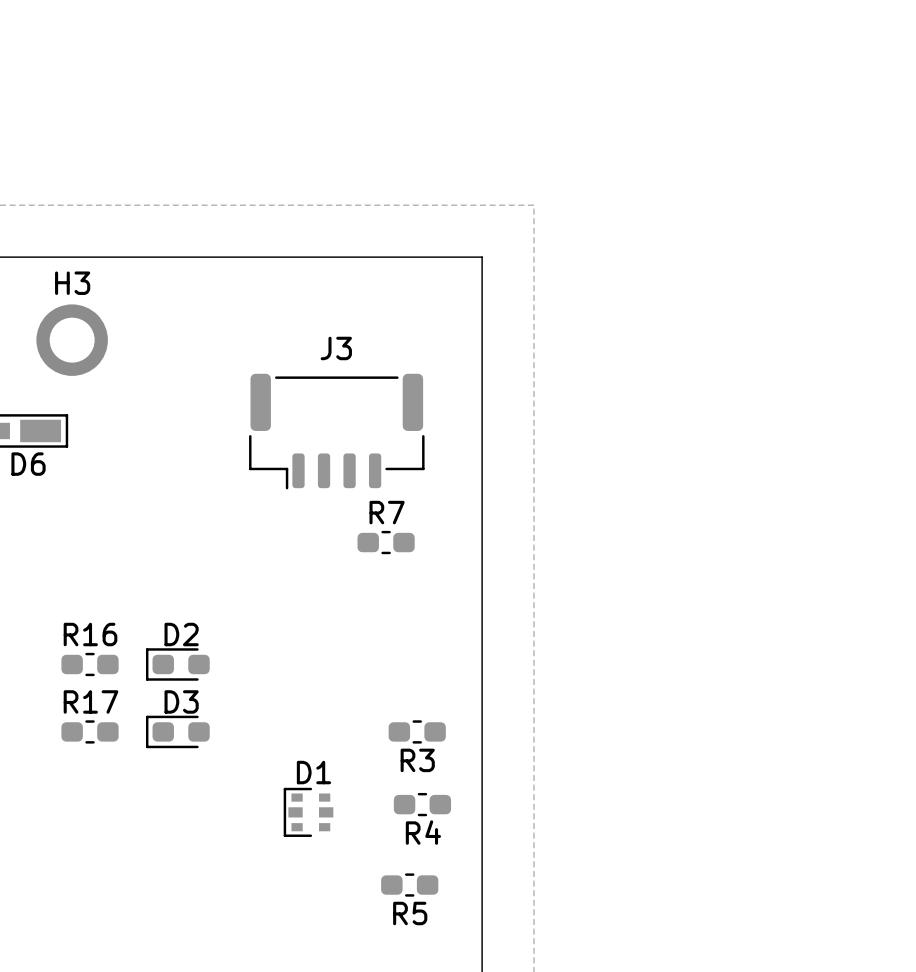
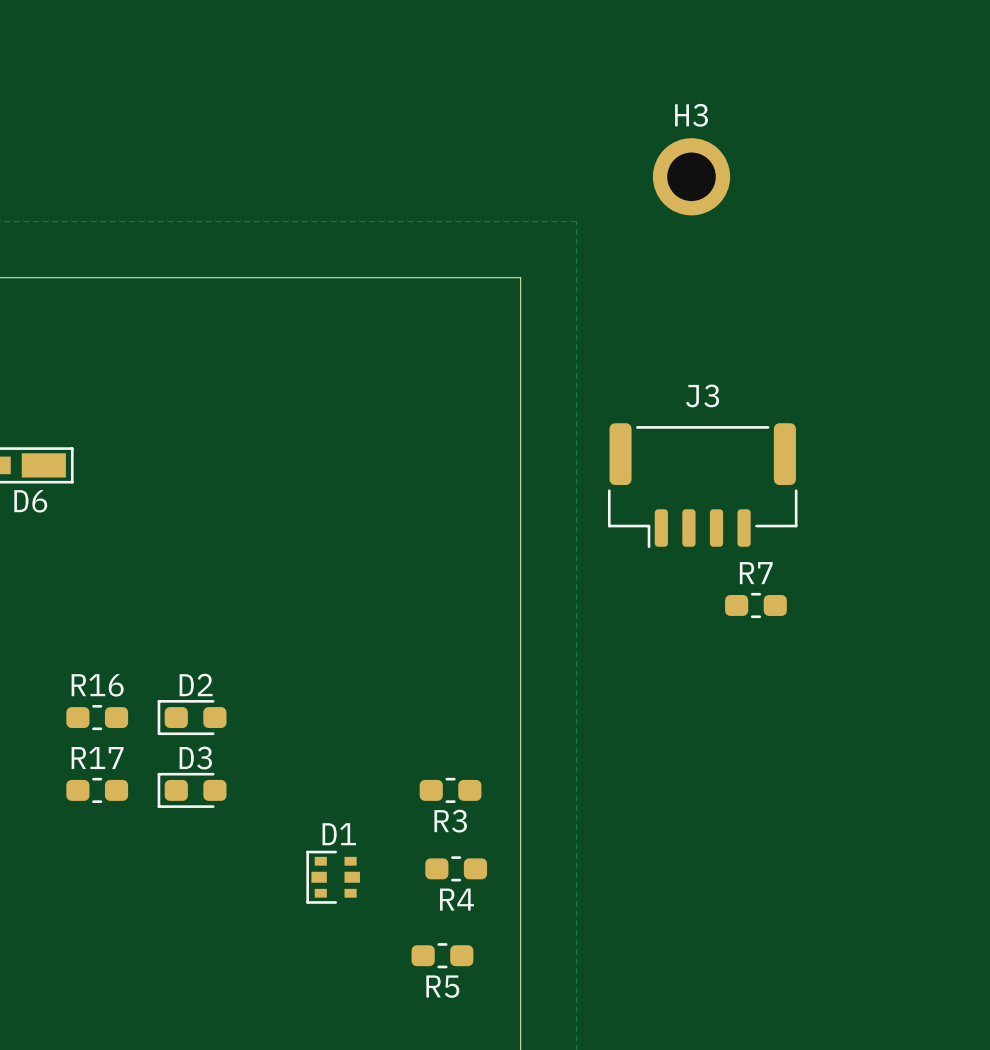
H3 position: (72, 340) -> (691, 176)
J3 position: (336, 431) -> (702, 485)
R7 position: (386, 542) -> (755, 605)

